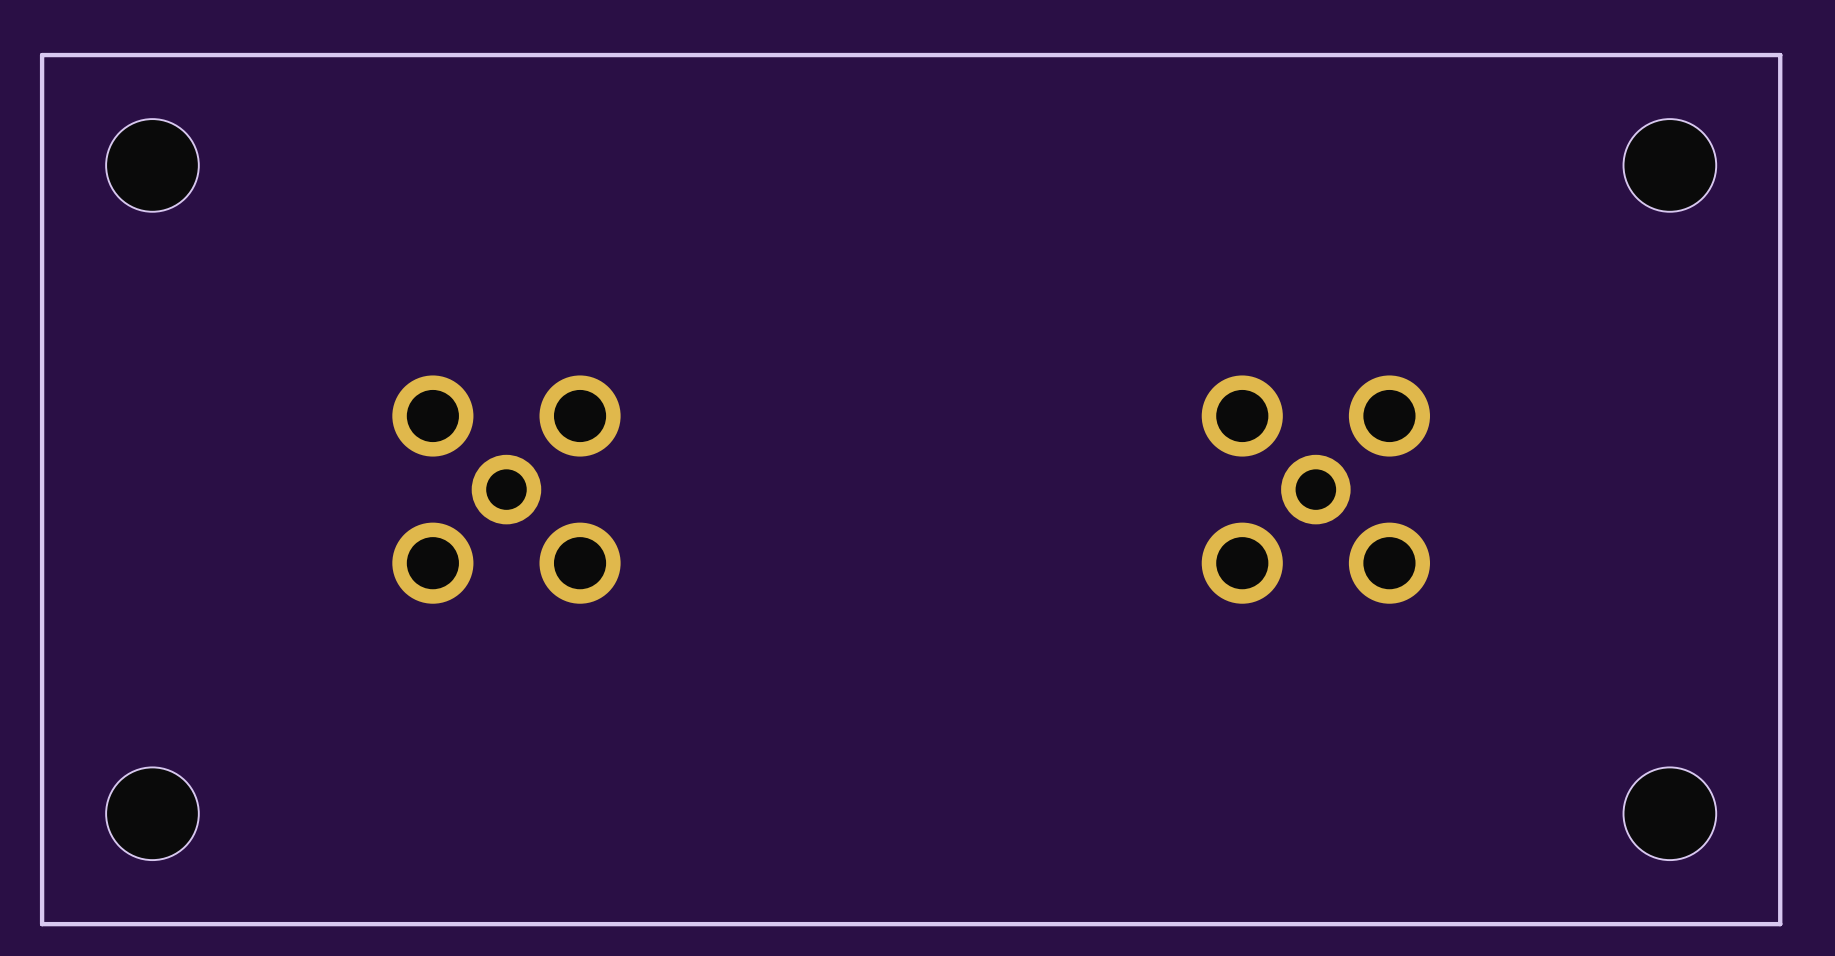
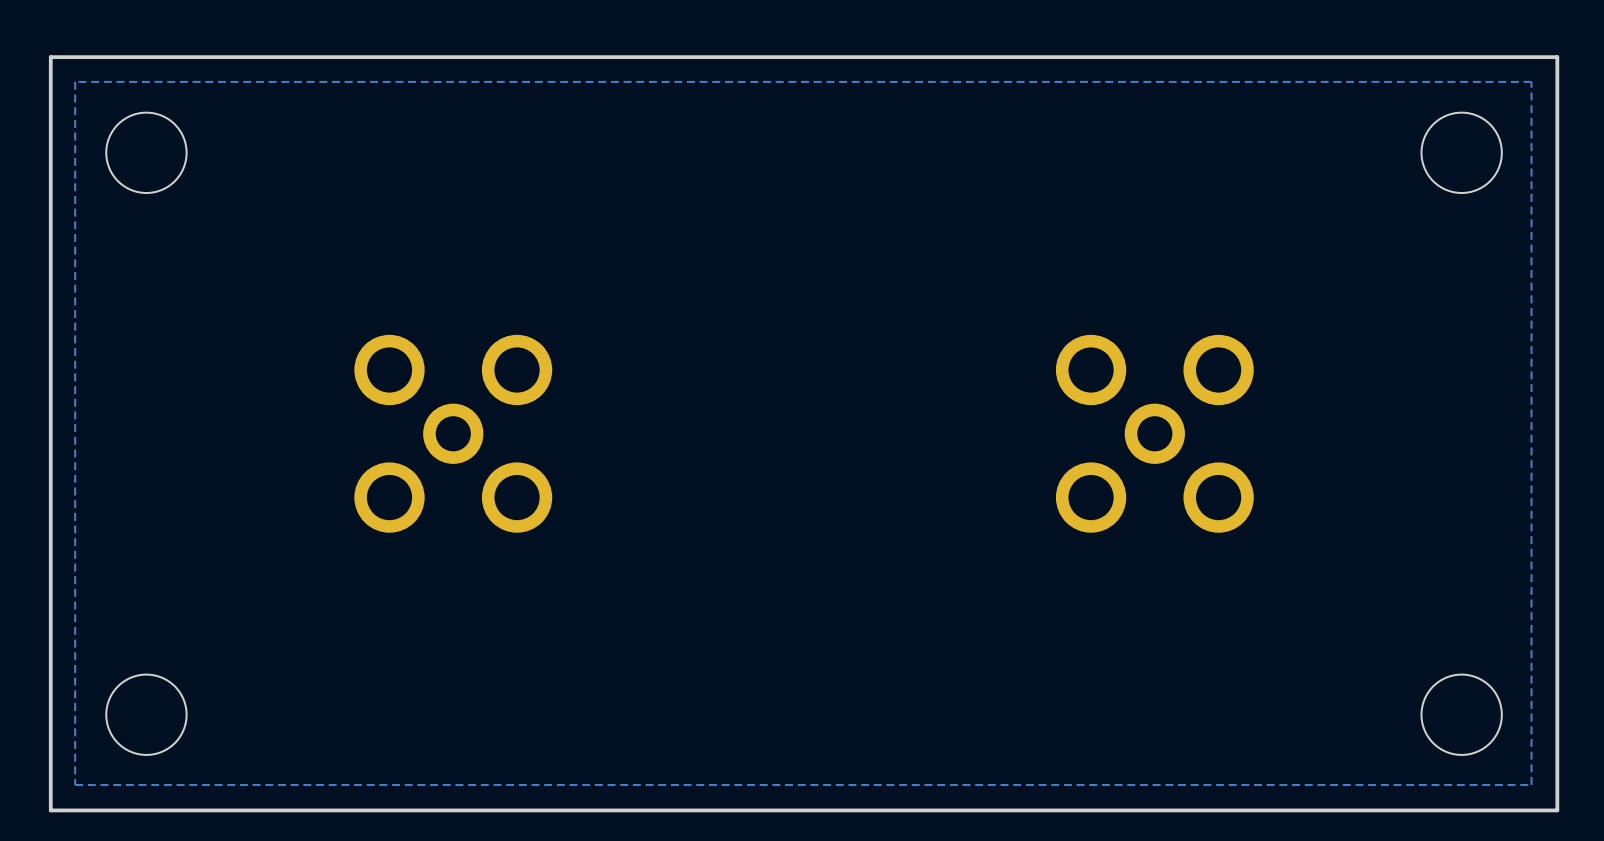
zone outline: none -> (1531, 81) (1531, 784) (75, 784) (75, 81) (1531, 81)

